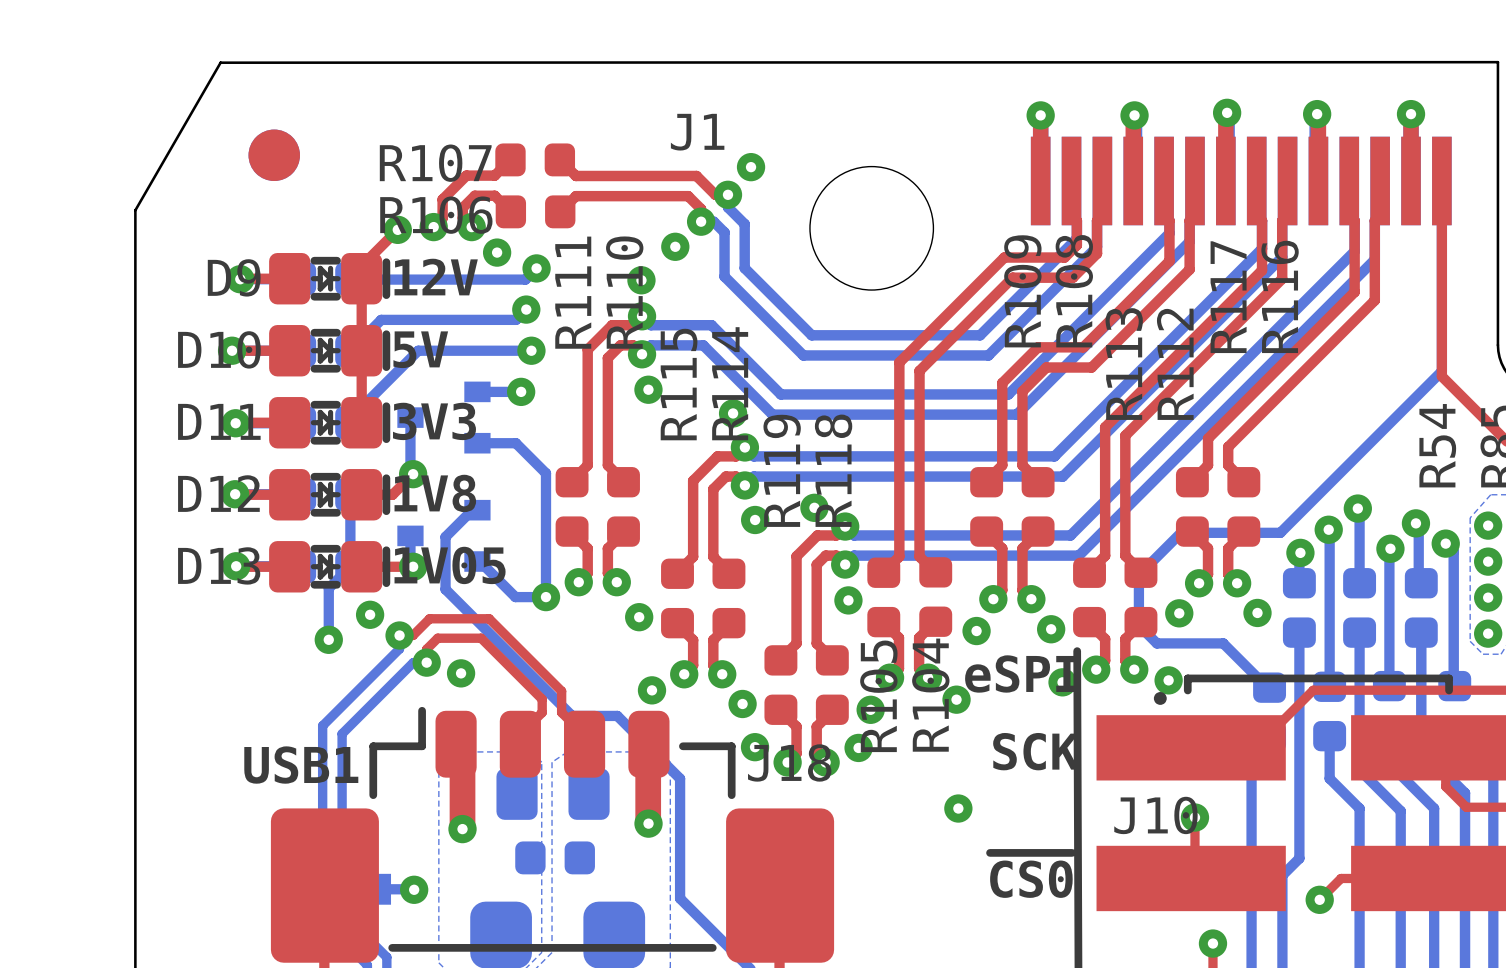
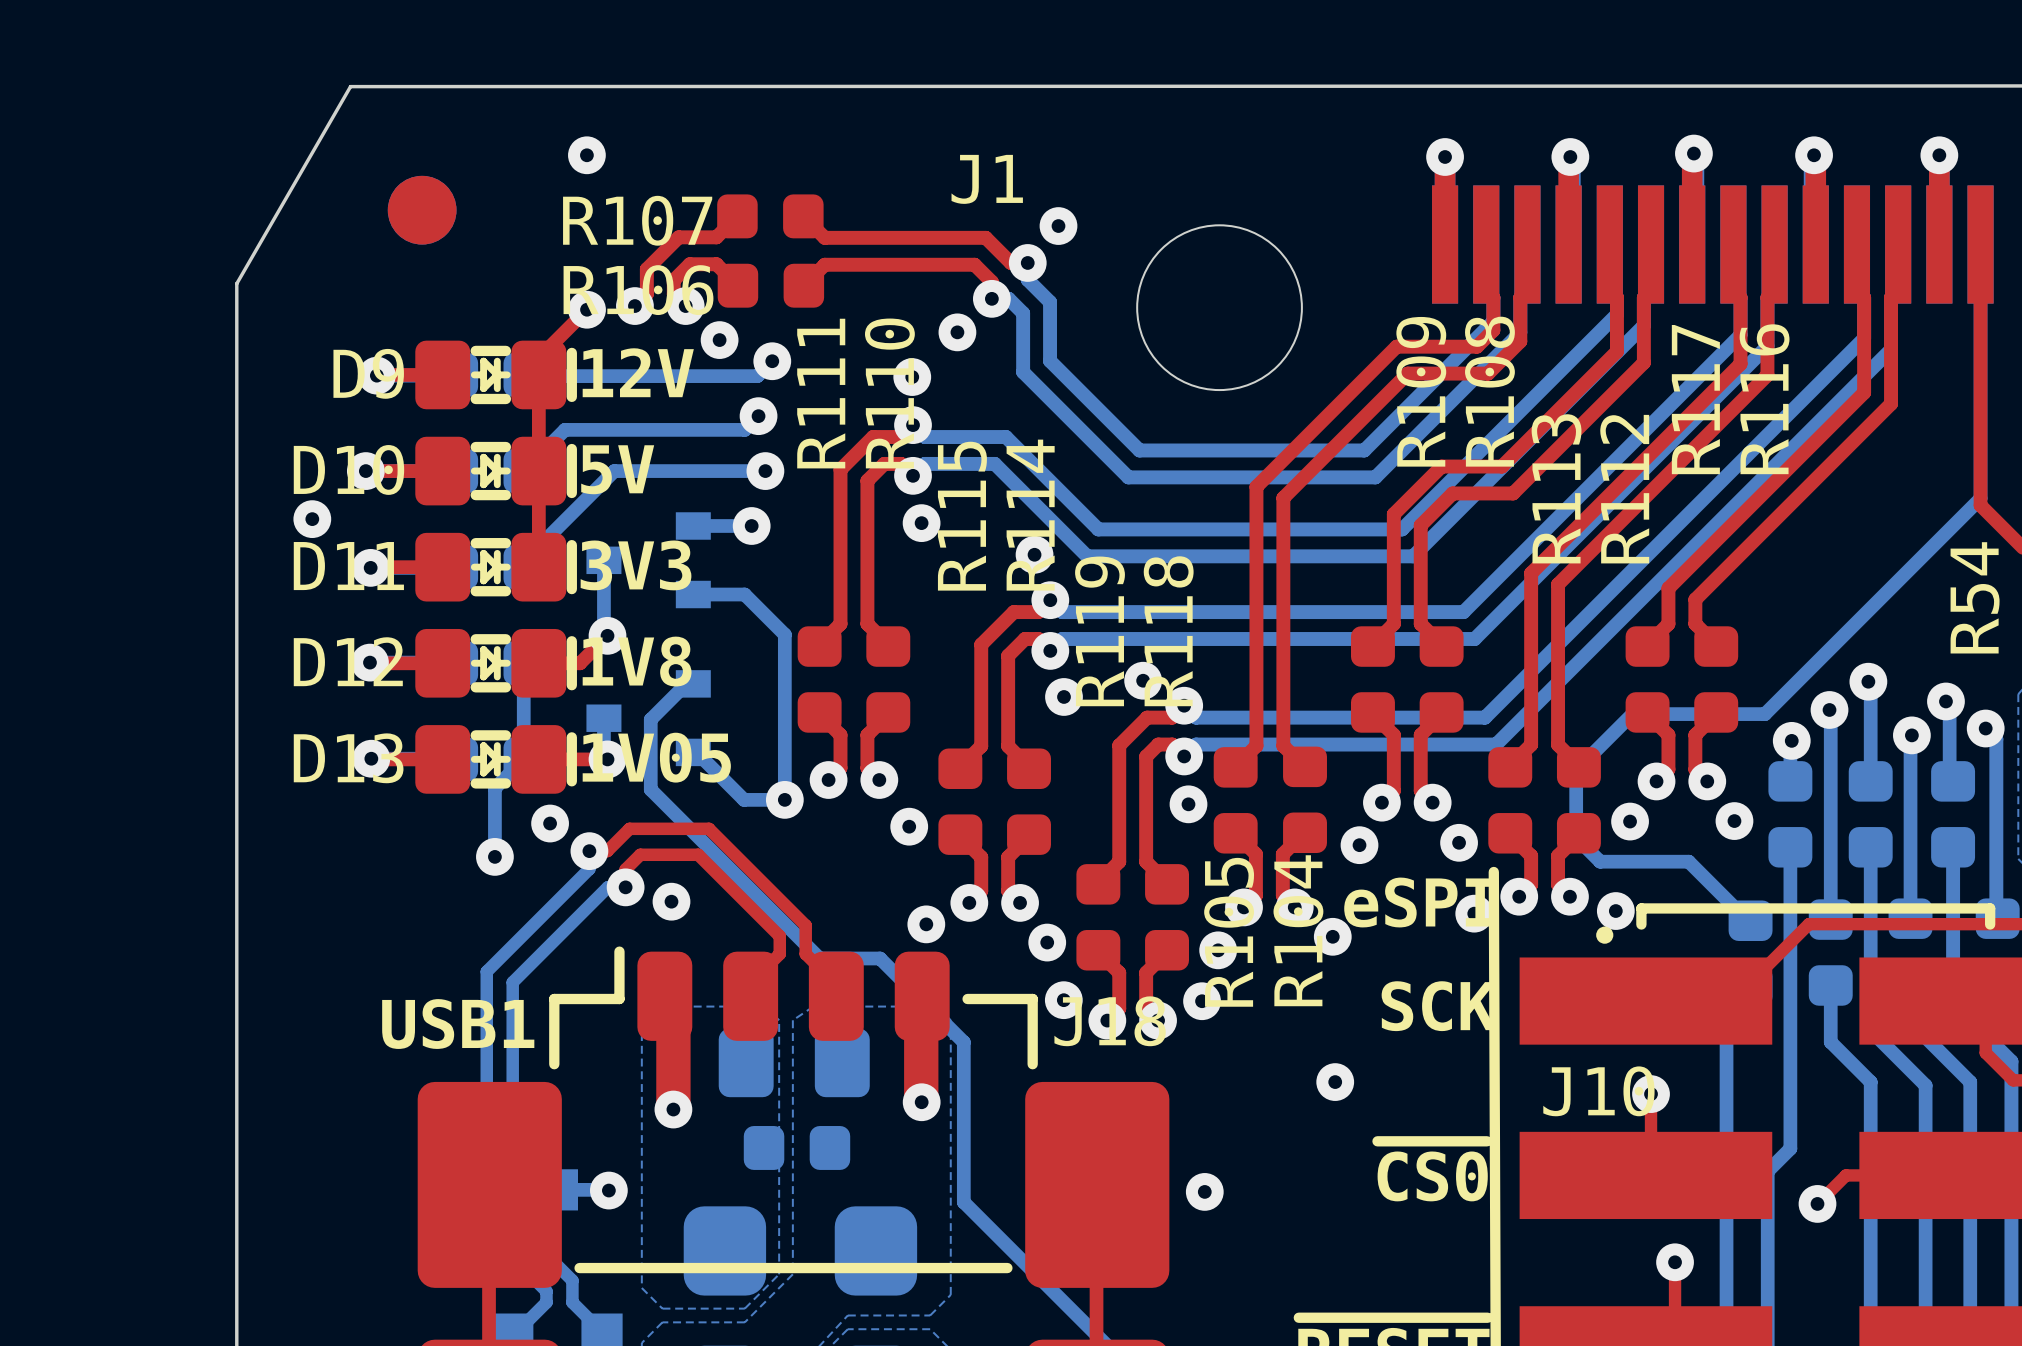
via: none -> (586, 155)
via: none -> (312, 519)
via: none -> (1204, 1191)

